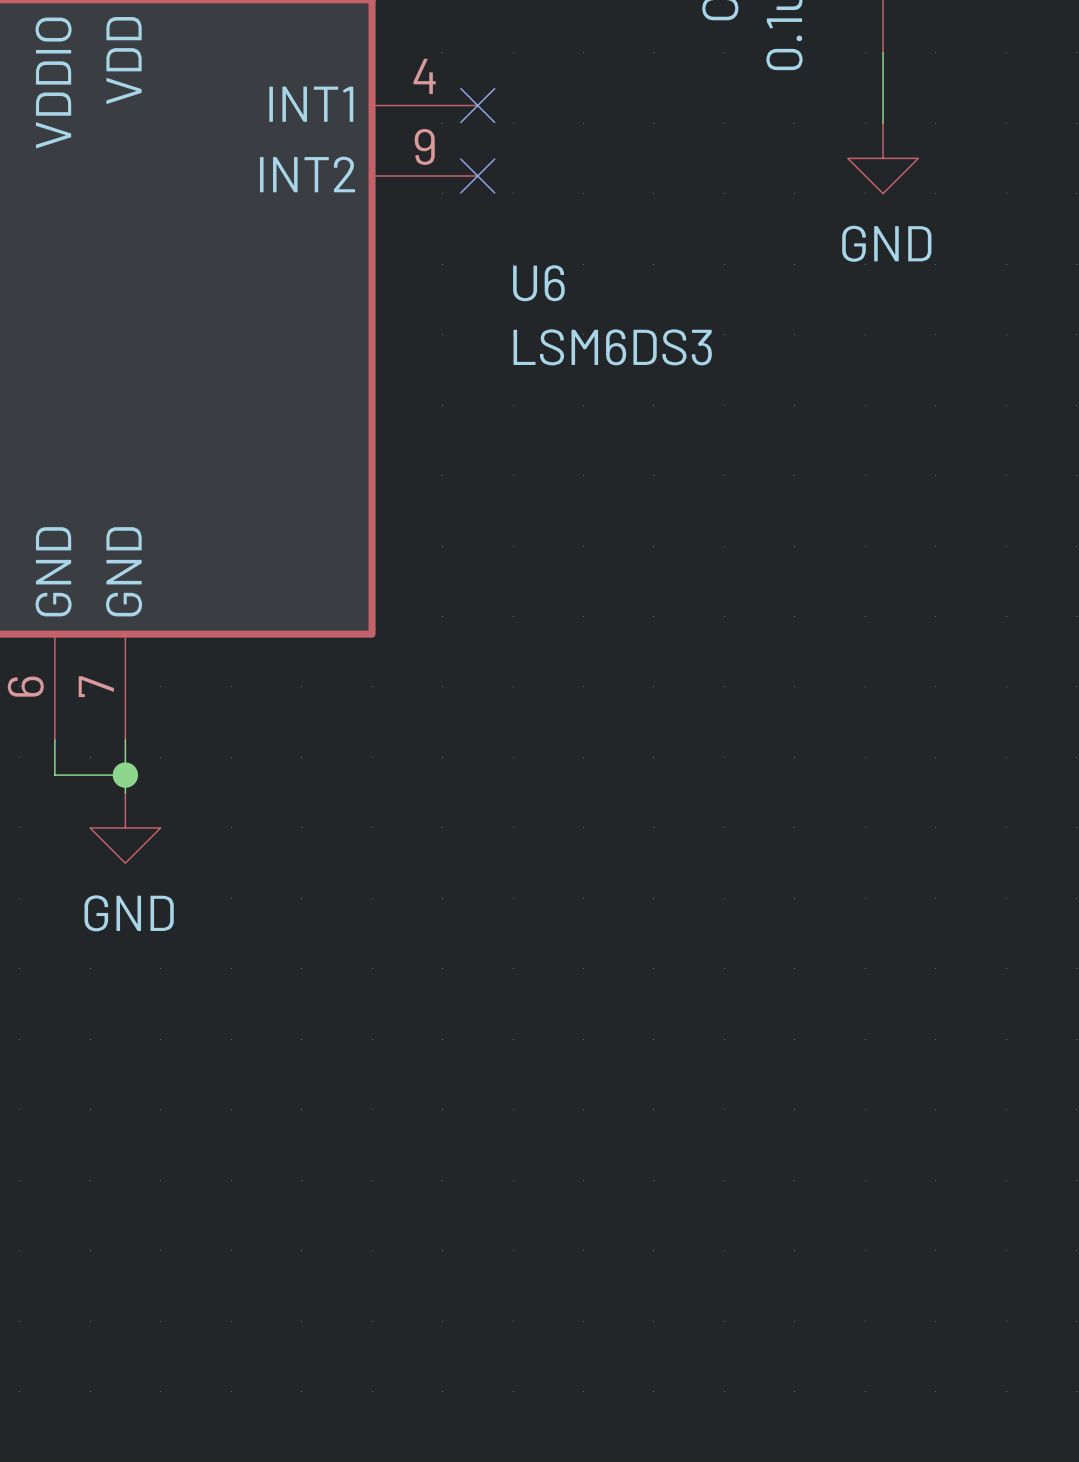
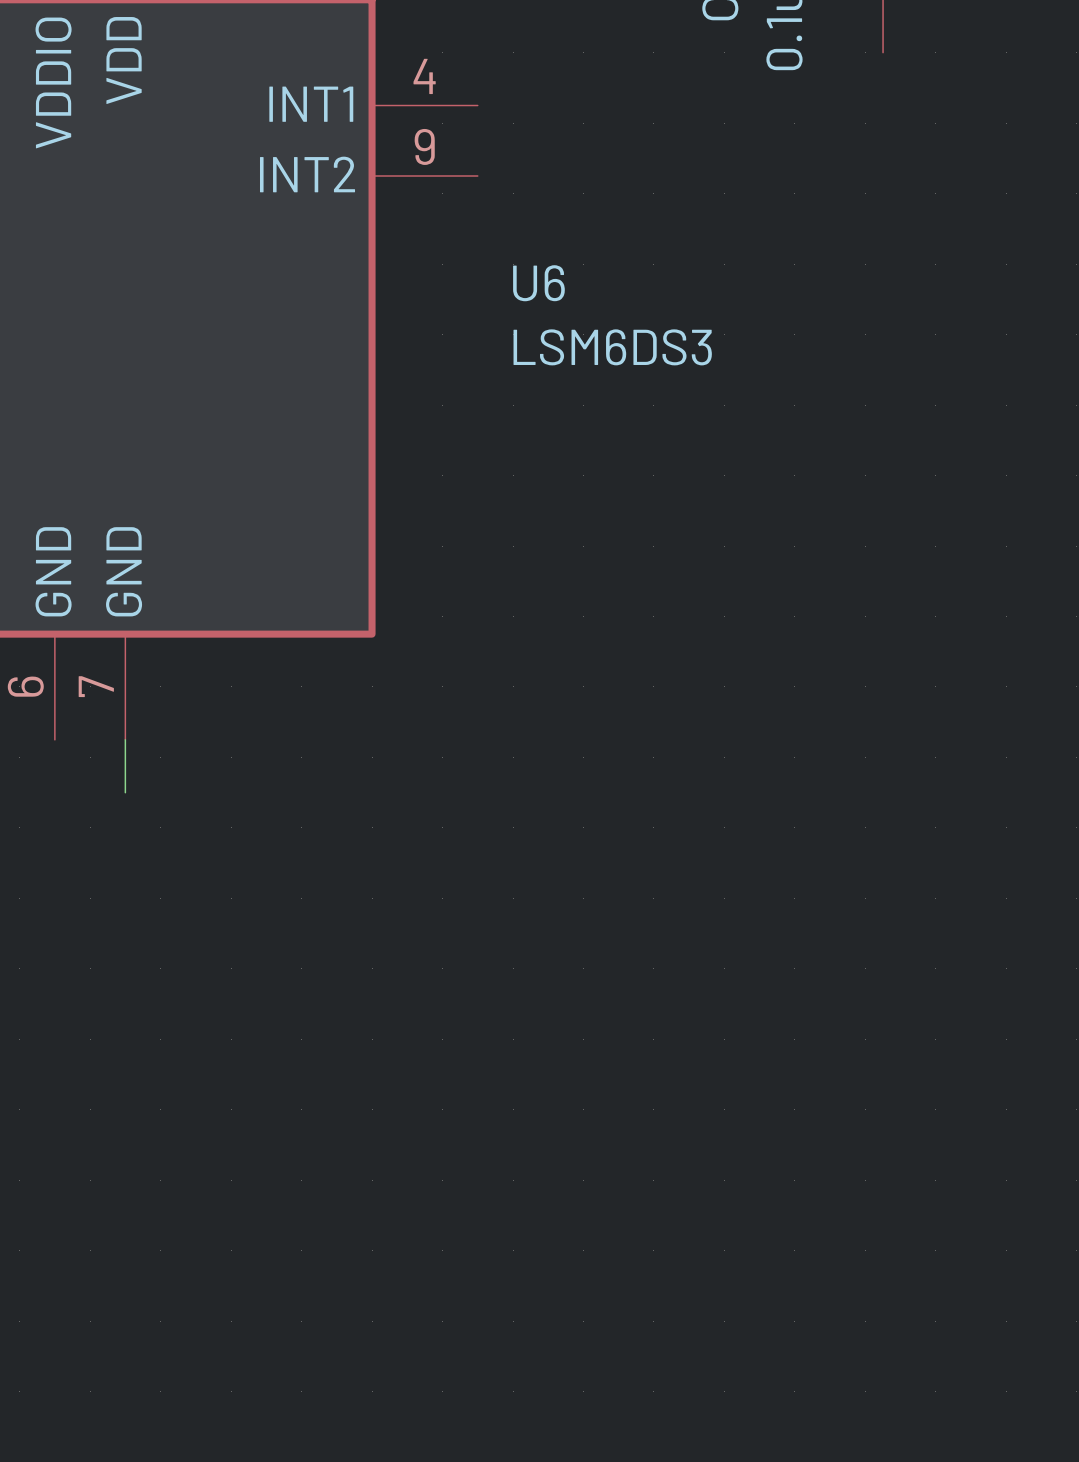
wire: (883, 52) (883, 123) -> none
no-connect mark: (477, 105) -> none
power symbol: GND (883, 158) -> none
no-connect mark: (477, 176) -> none
wire: (54, 739) (54, 775) (125, 775) -> none
junction: (125, 775) -> none
power symbol: GND (125, 827) -> none

